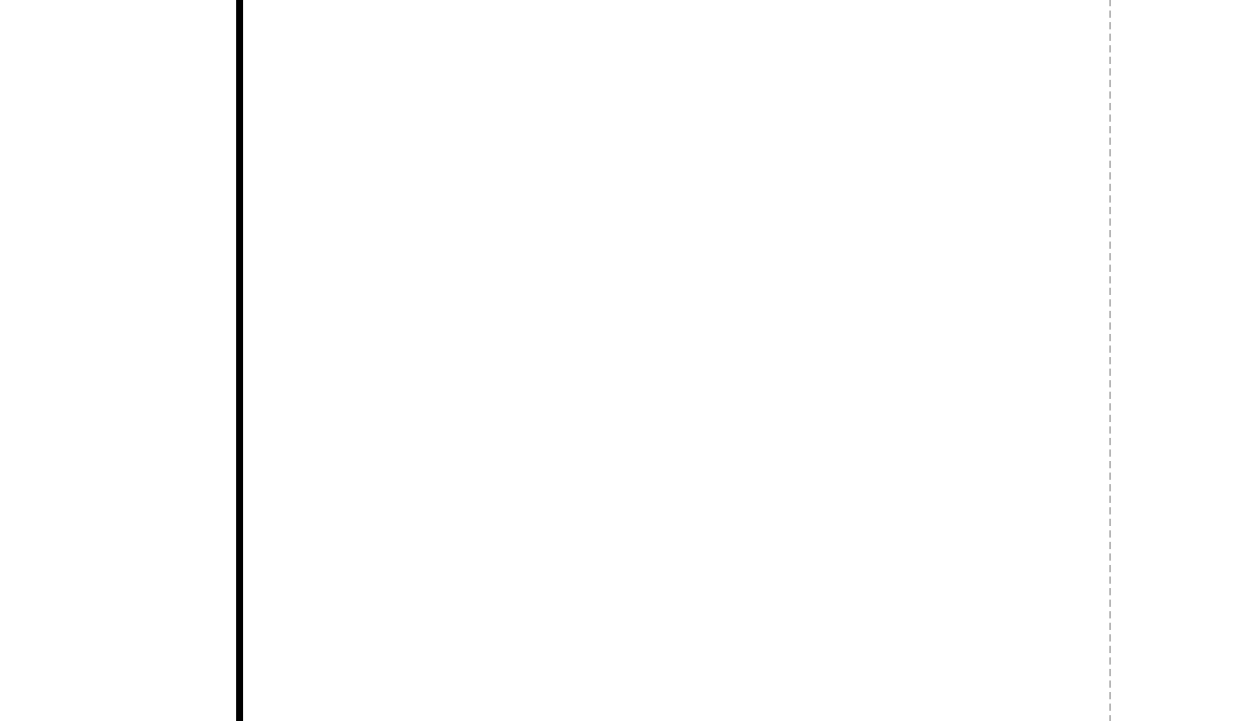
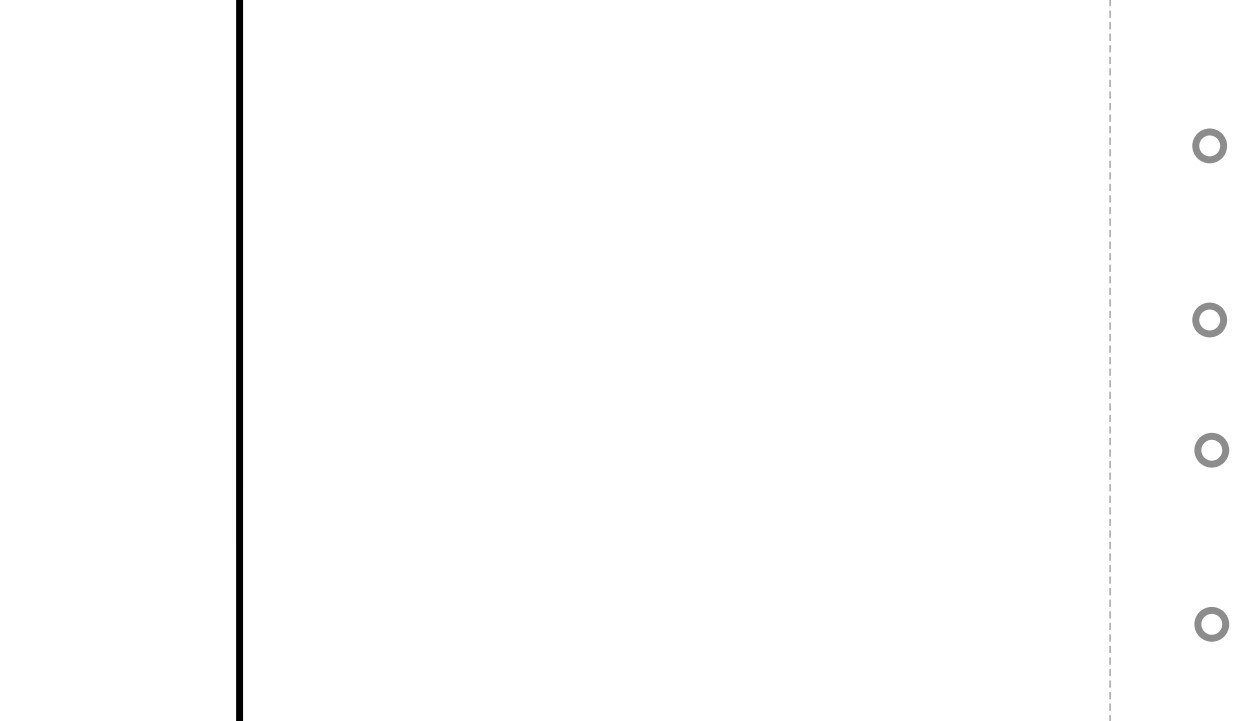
via: none -> (1209, 145)
via: none -> (1209, 319)
via: none -> (1211, 450)
via: none -> (1211, 624)

